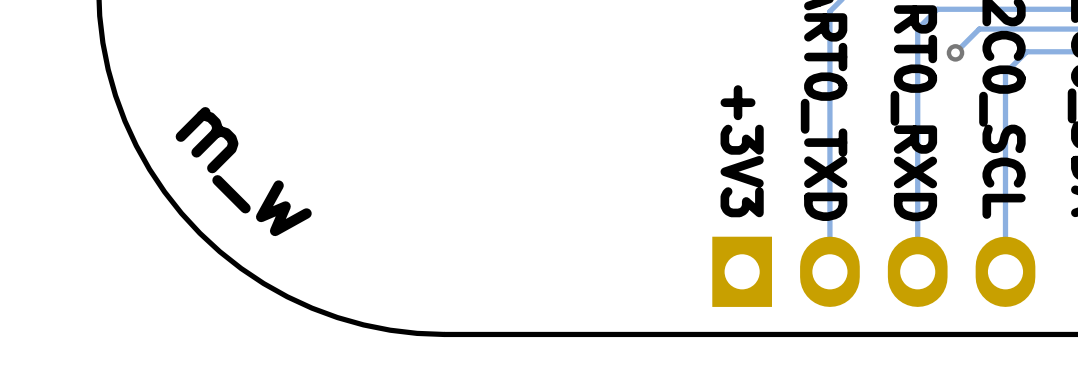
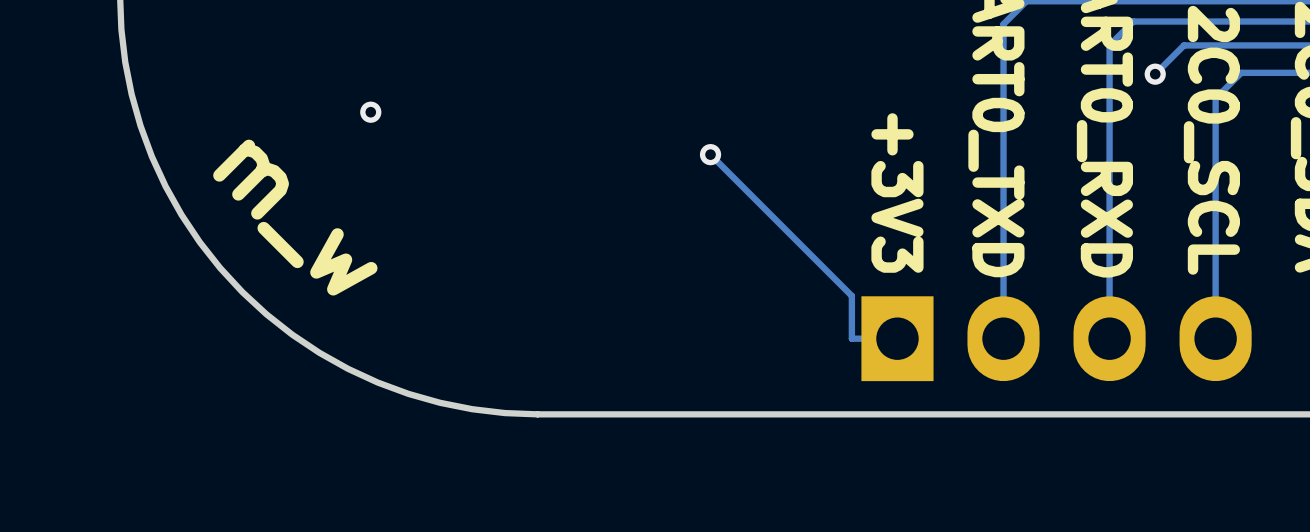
via: none -> (370, 112)
track: none -> (710, 154) (851, 295) (851, 338) (897, 338)
via: none -> (710, 154)

